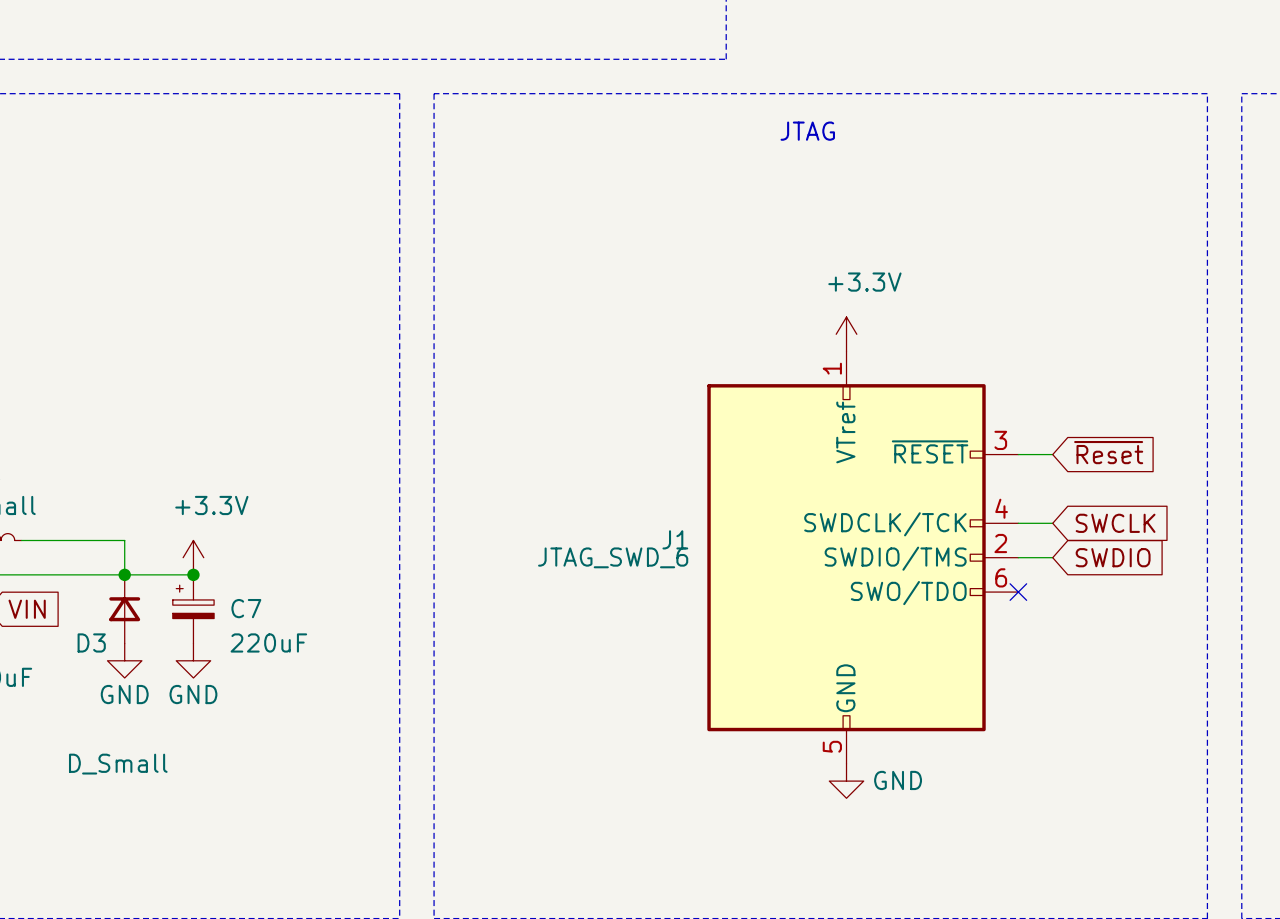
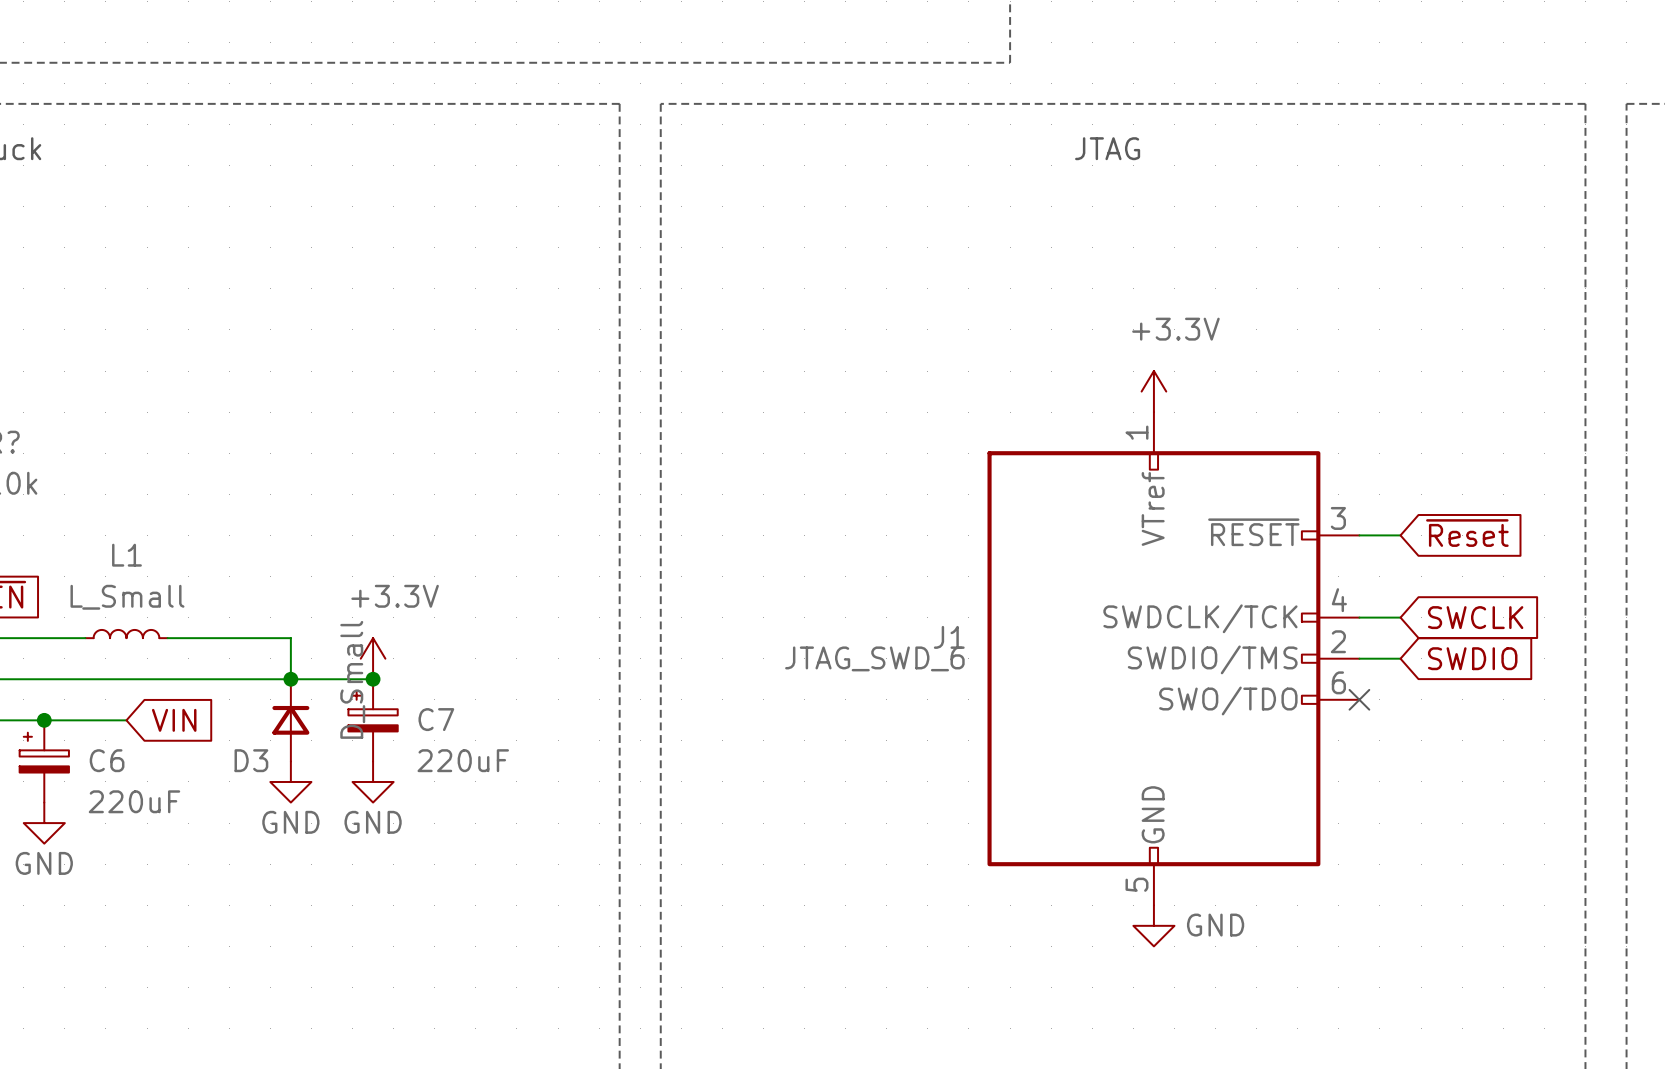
D3 value rotation: 0° (118, 764) -> 90° counterclockwise (352, 679)
D3 value position: D_Small (118, 764) -> D_Small (352, 679)

